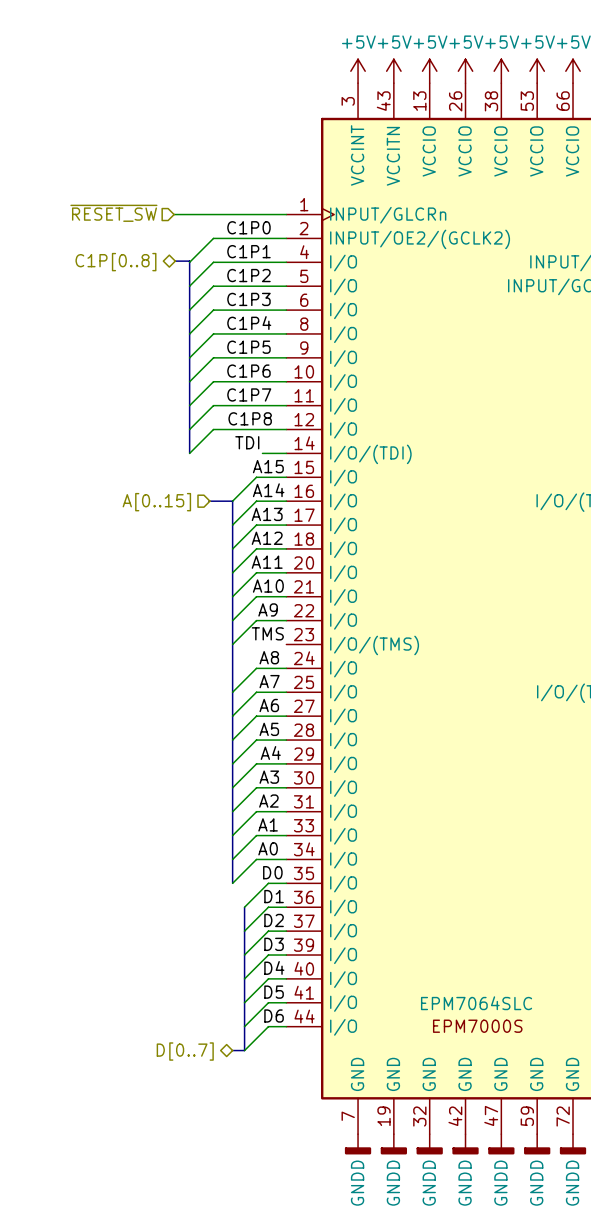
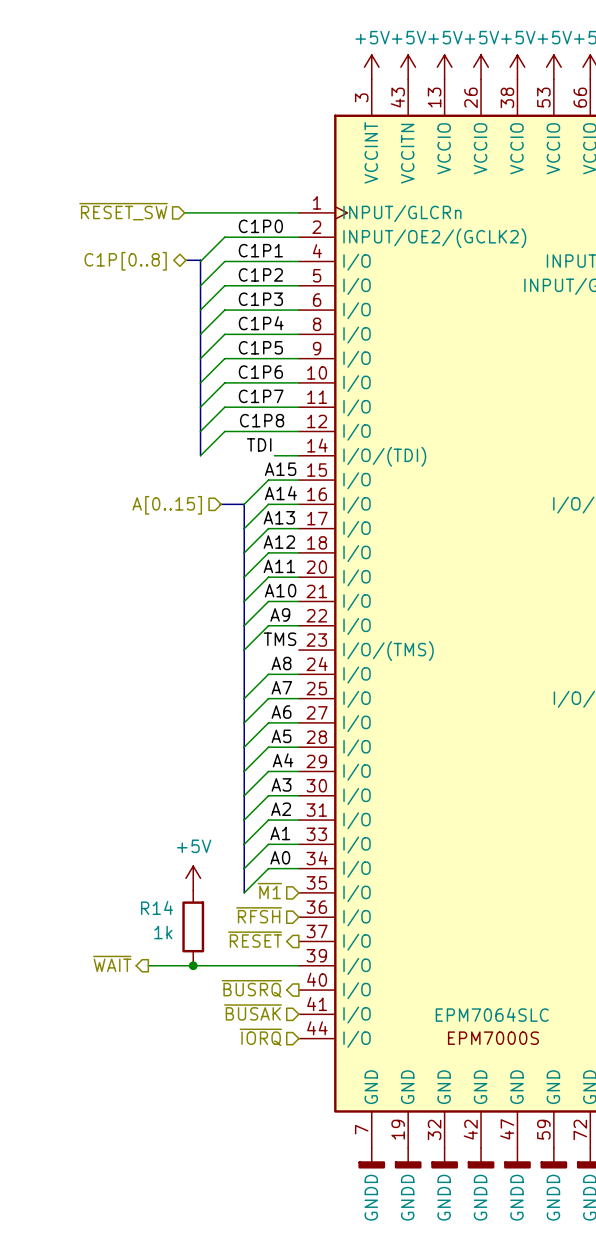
power symbol: none -> +5V (193, 878)
label: D0 (272, 872) -> none
hierarchical label: none -> ~{M1} (269, 891)
wire: (286, 883) (268, 883) (244, 907) -> none
label: D1 (274, 896) -> none
hierarchical label: none -> ~{RFSH} (259, 915)
bus: (244, 907) (244, 1050) (232, 1050) -> none
wire: (286, 907) (268, 907) (244, 931) -> none
R14: none -> 1k (193, 926)
label: D2 (274, 920) -> none
hierarchical label: none -> ~{RESET} (255, 939)
wire: (286, 931) (268, 931) (244, 955) -> none
label: D3 (274, 944) -> none
hierarchical label: none -> ~{WAIT} (112, 963)
junction: none -> (193, 965)
wire: (268, 955) (244, 978) -> (280, 965) (148, 965)
label: D4 (274, 967) -> none
hierarchical label: none -> ~{BUSRQ} (251, 988)
wire: (286, 978) (268, 978) (244, 1002) -> none
label: D5 (274, 992) -> none
hierarchical label: none -> ~{BUSAK} (253, 1012)
wire: (286, 1002) (268, 1002) (244, 1026) -> none
label: D6 (274, 1016) -> none
hierarchical label: none -> ~{IORQ} (260, 1037)
wire: (286, 1026) (268, 1026) (244, 1050) -> none
hierarchical label: D[0..7] (185, 1051) -> none

